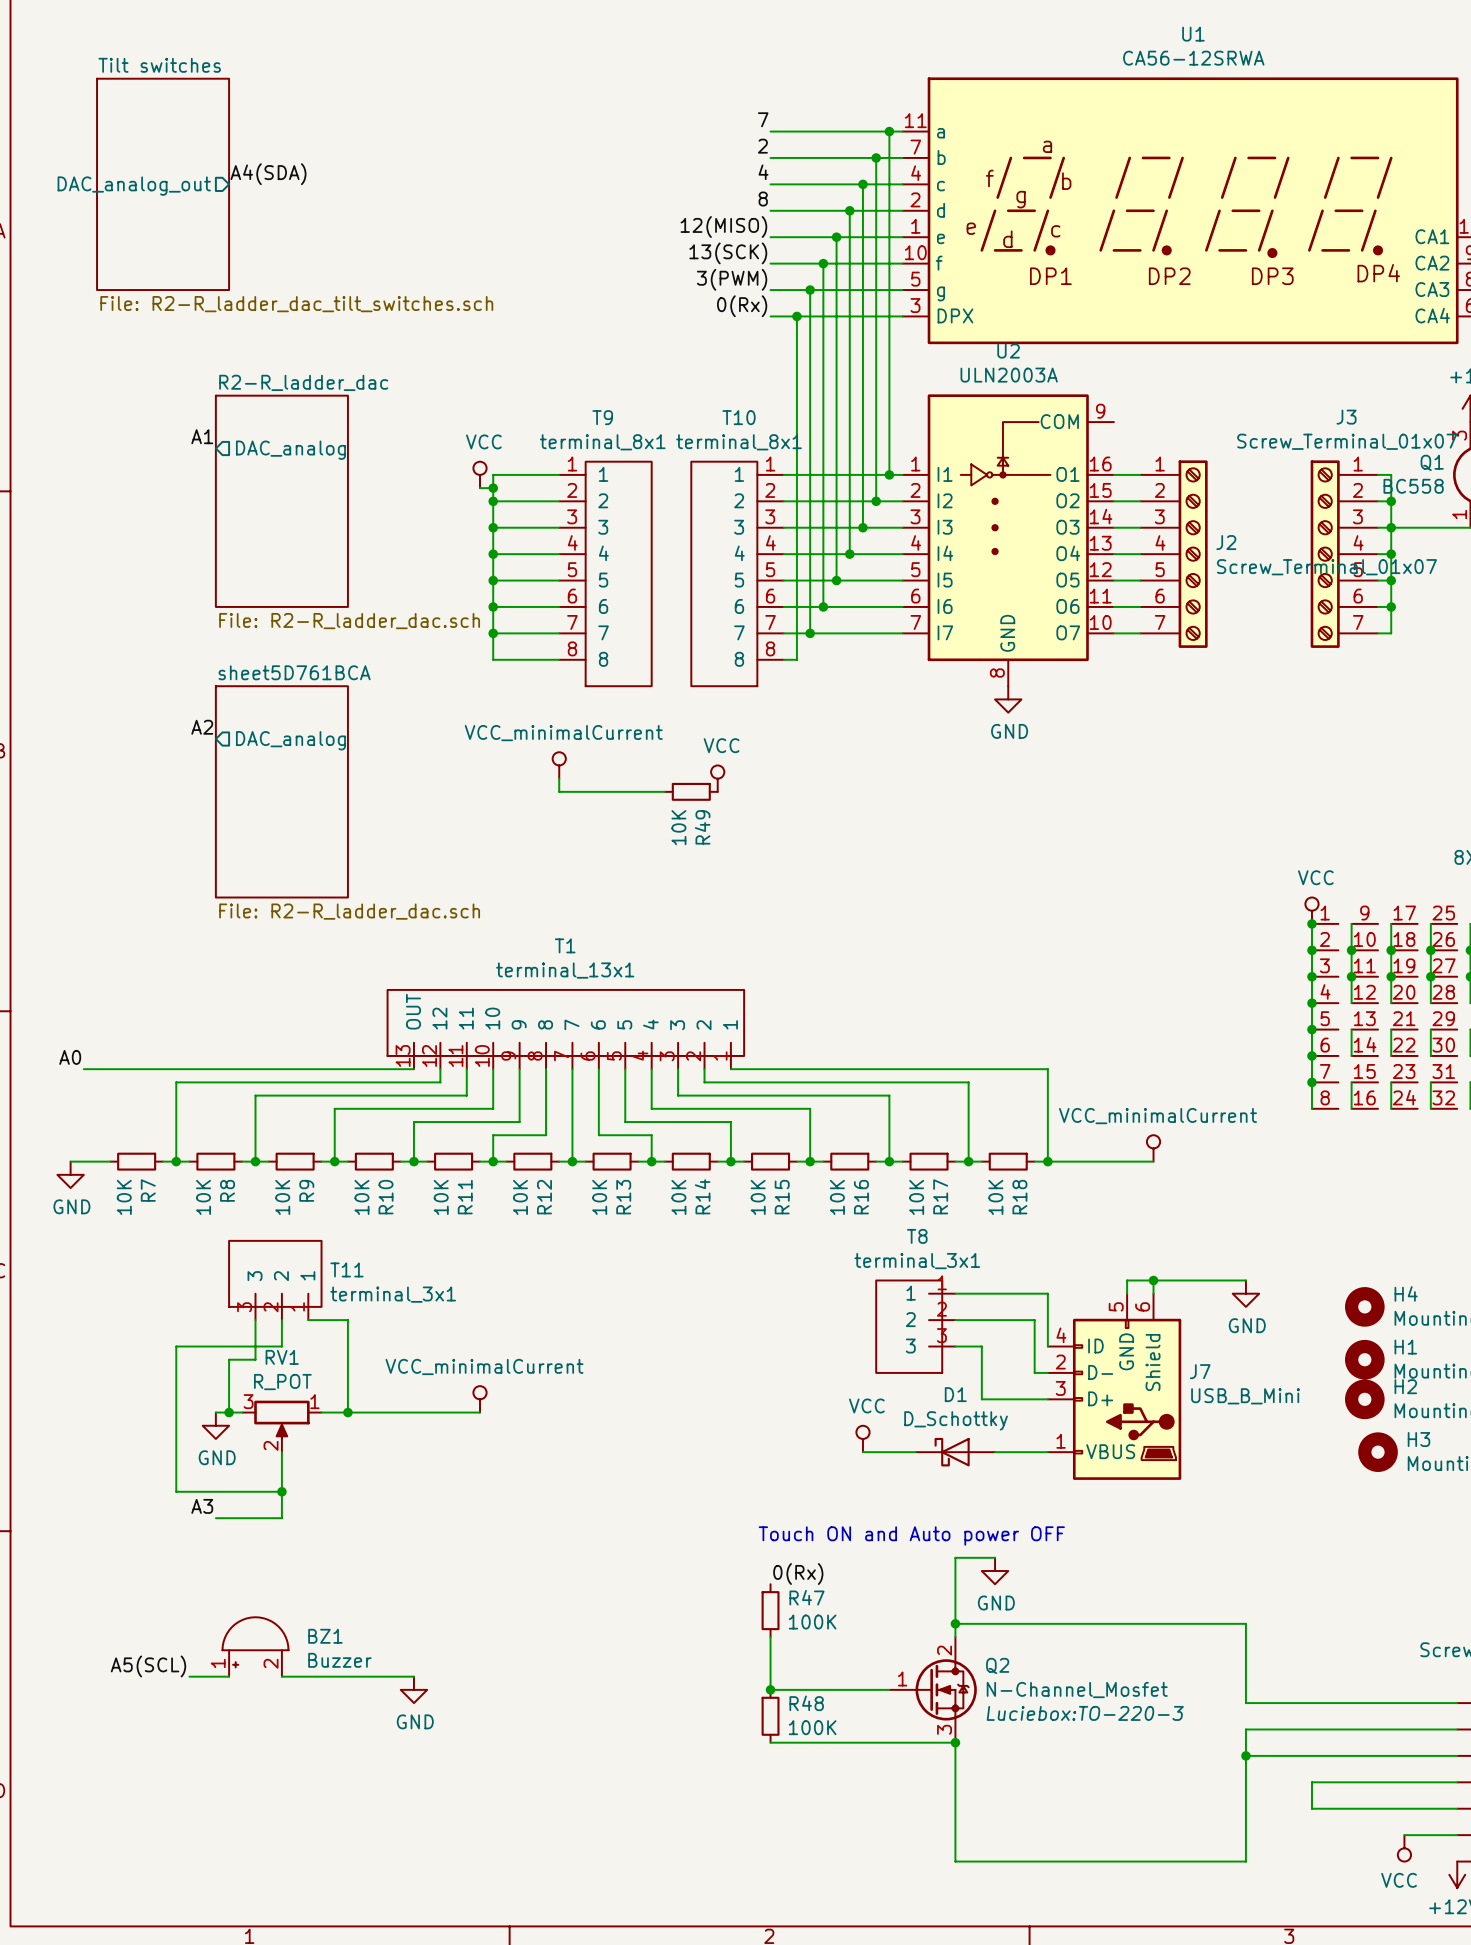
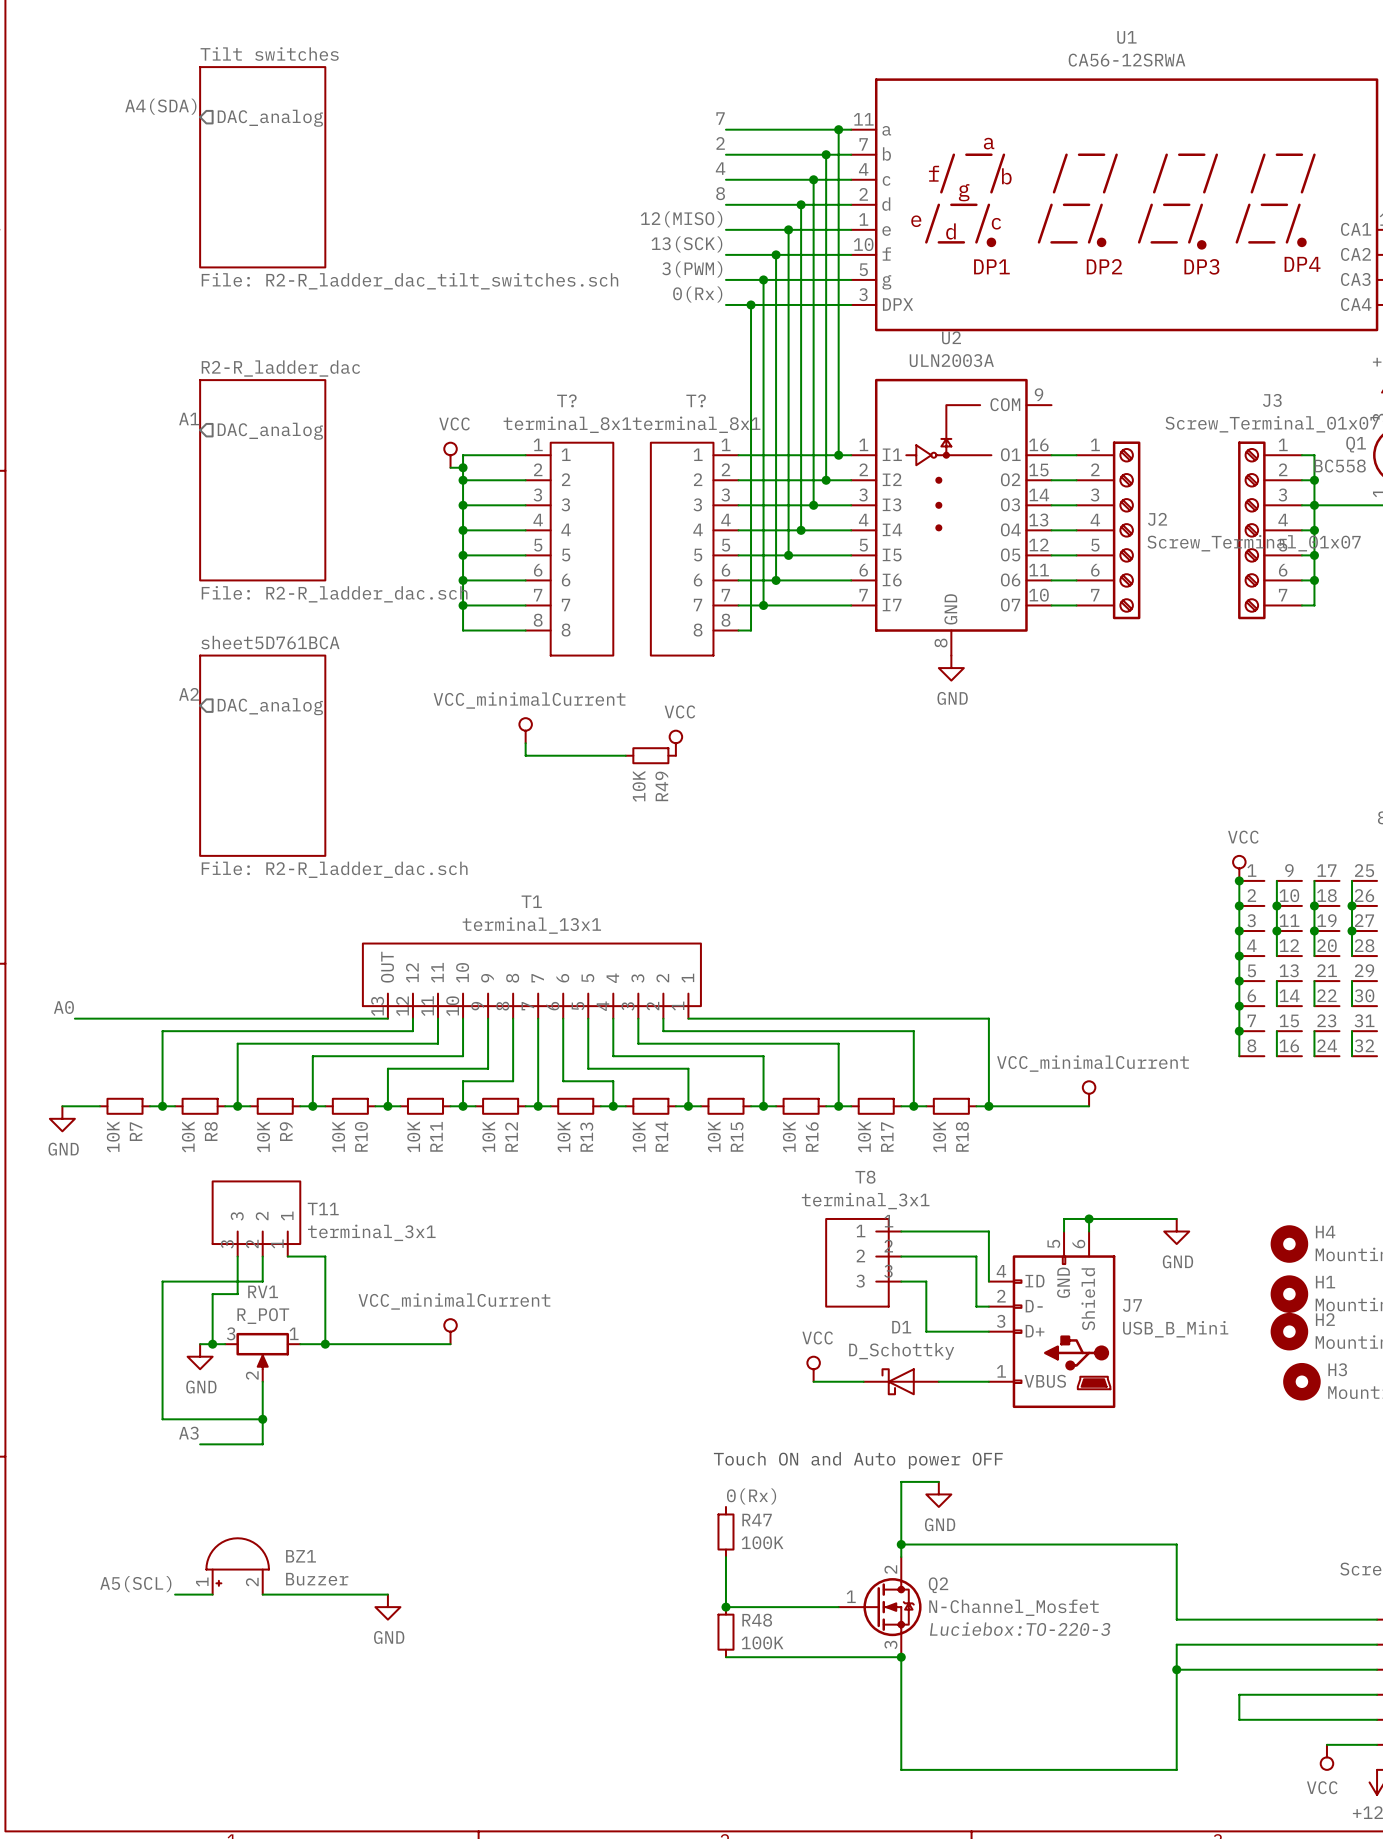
sheet pin: none -> DAC_analog (270, 118)
label position: A4(SDA) (268, 174) -> A4(SDA) (160, 106)
sheet Tilt switches position: (163, 184) -> (262, 167)
sheet pin: DAC_analog_out (134, 186) -> none
T9 name: T9 (602, 417) -> T? (566, 400)
T10 name: T10 (739, 417) -> T? (696, 400)

